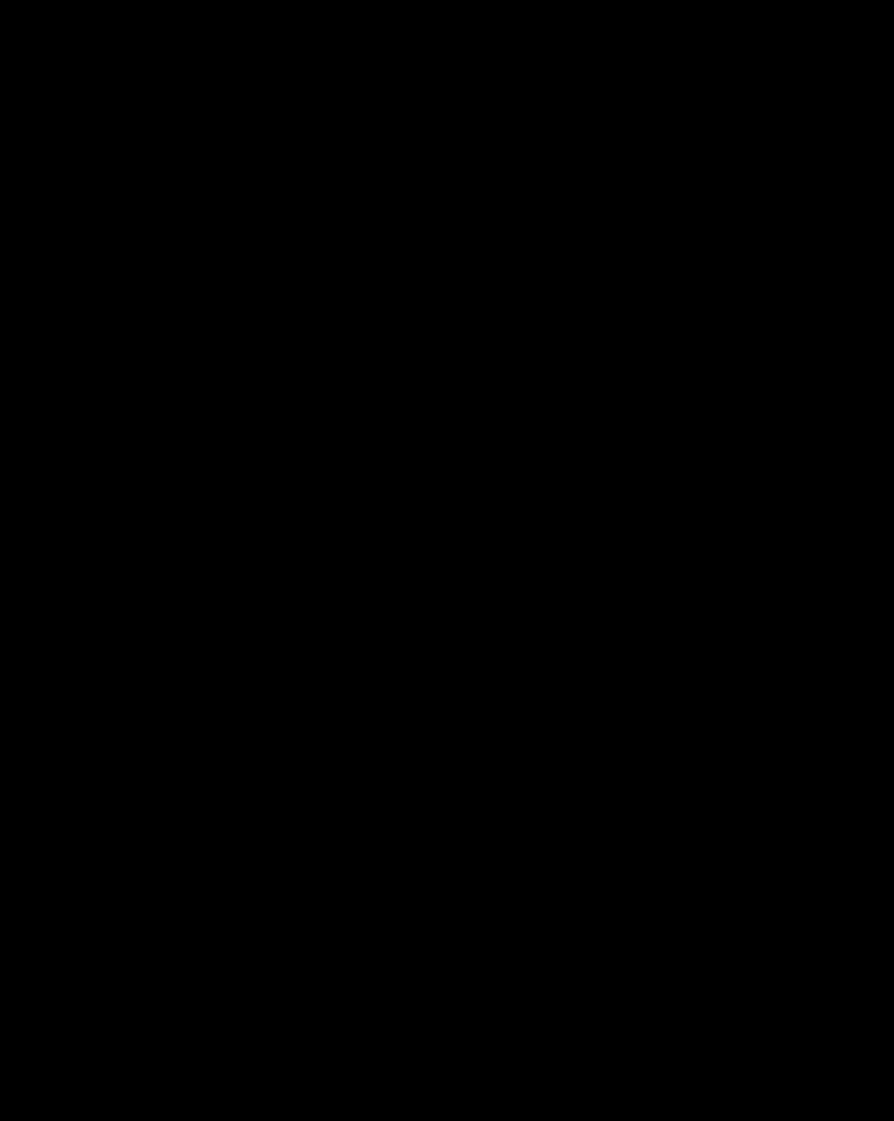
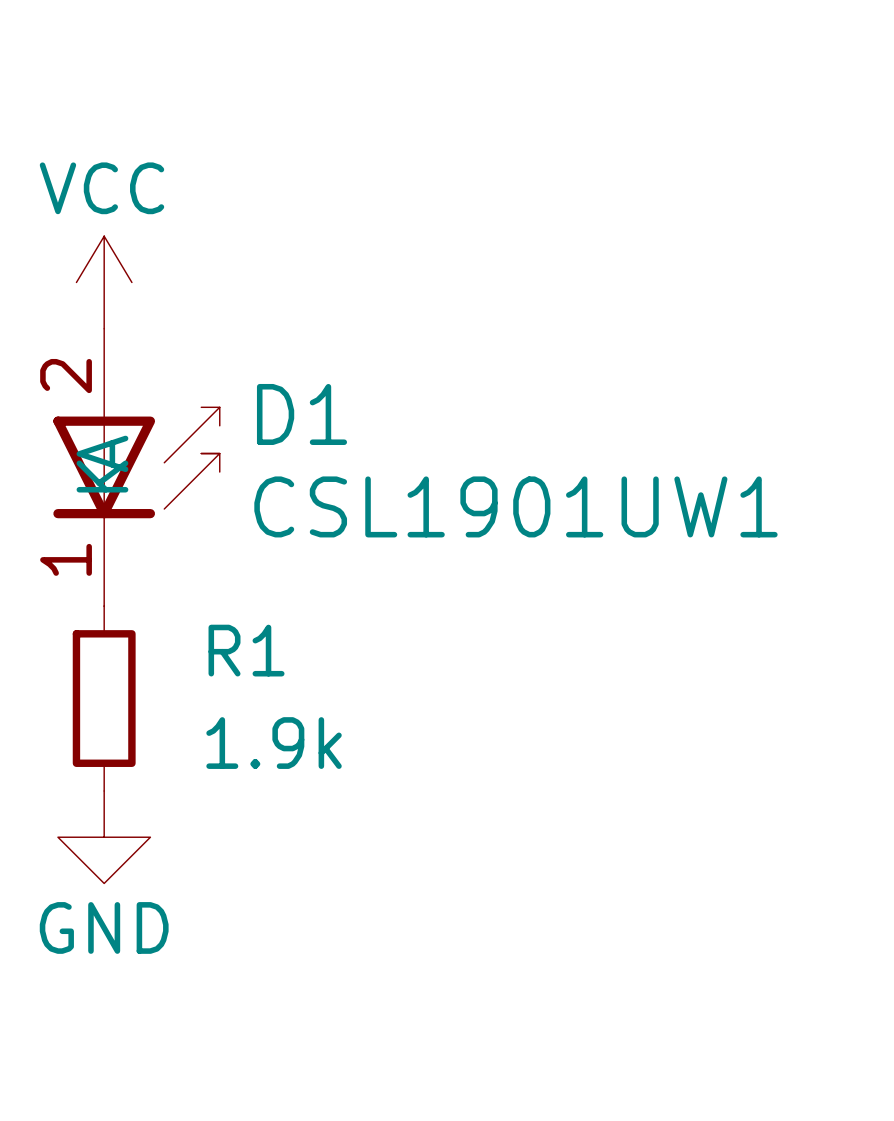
power symbol: none -> VCC (104, 282)
D1: none -> CSL1901UW1 (136, 467)
R1: none -> 1.9k (104, 698)
power symbol: none -> GND (104, 837)

